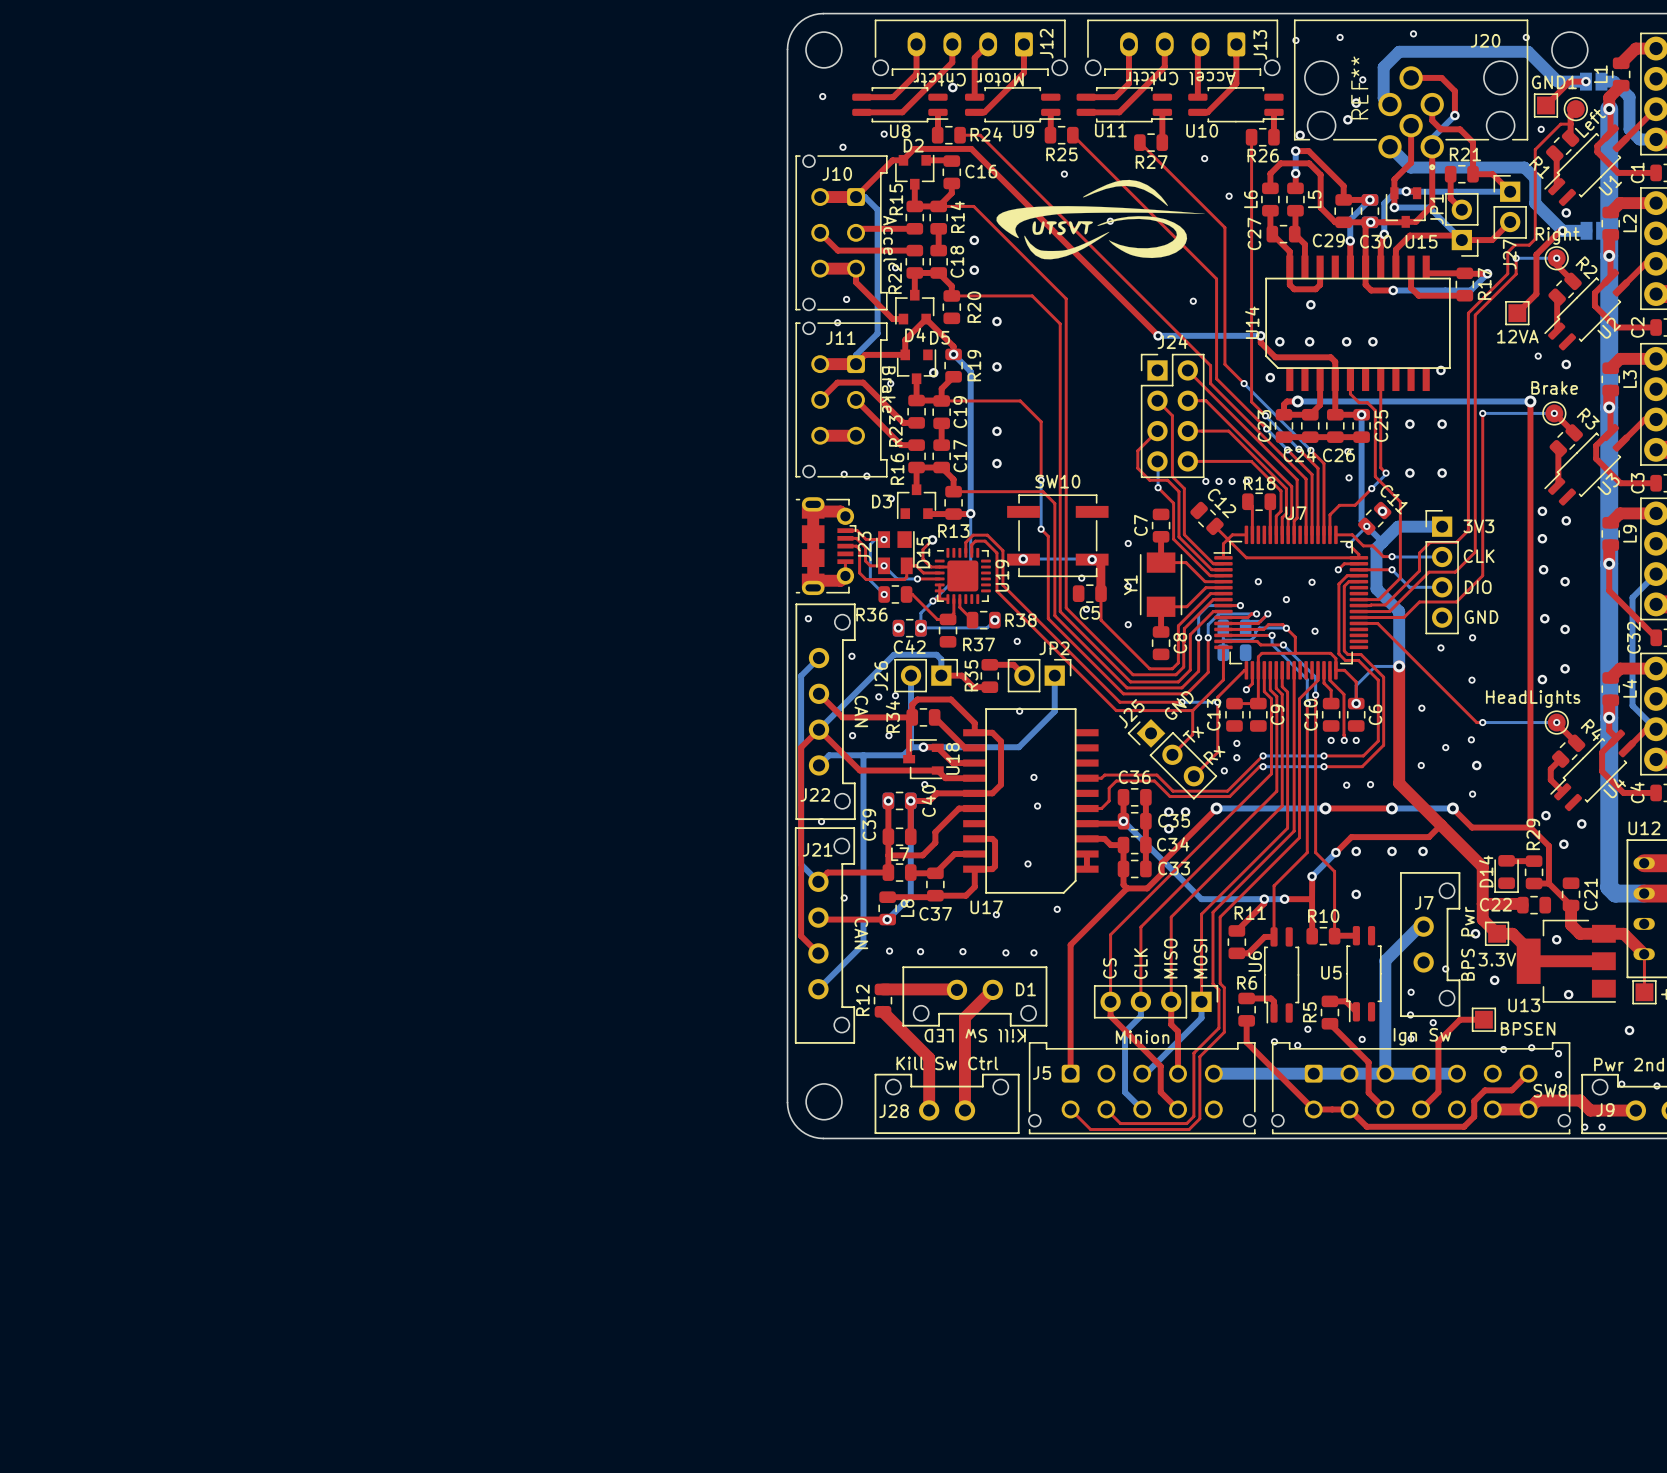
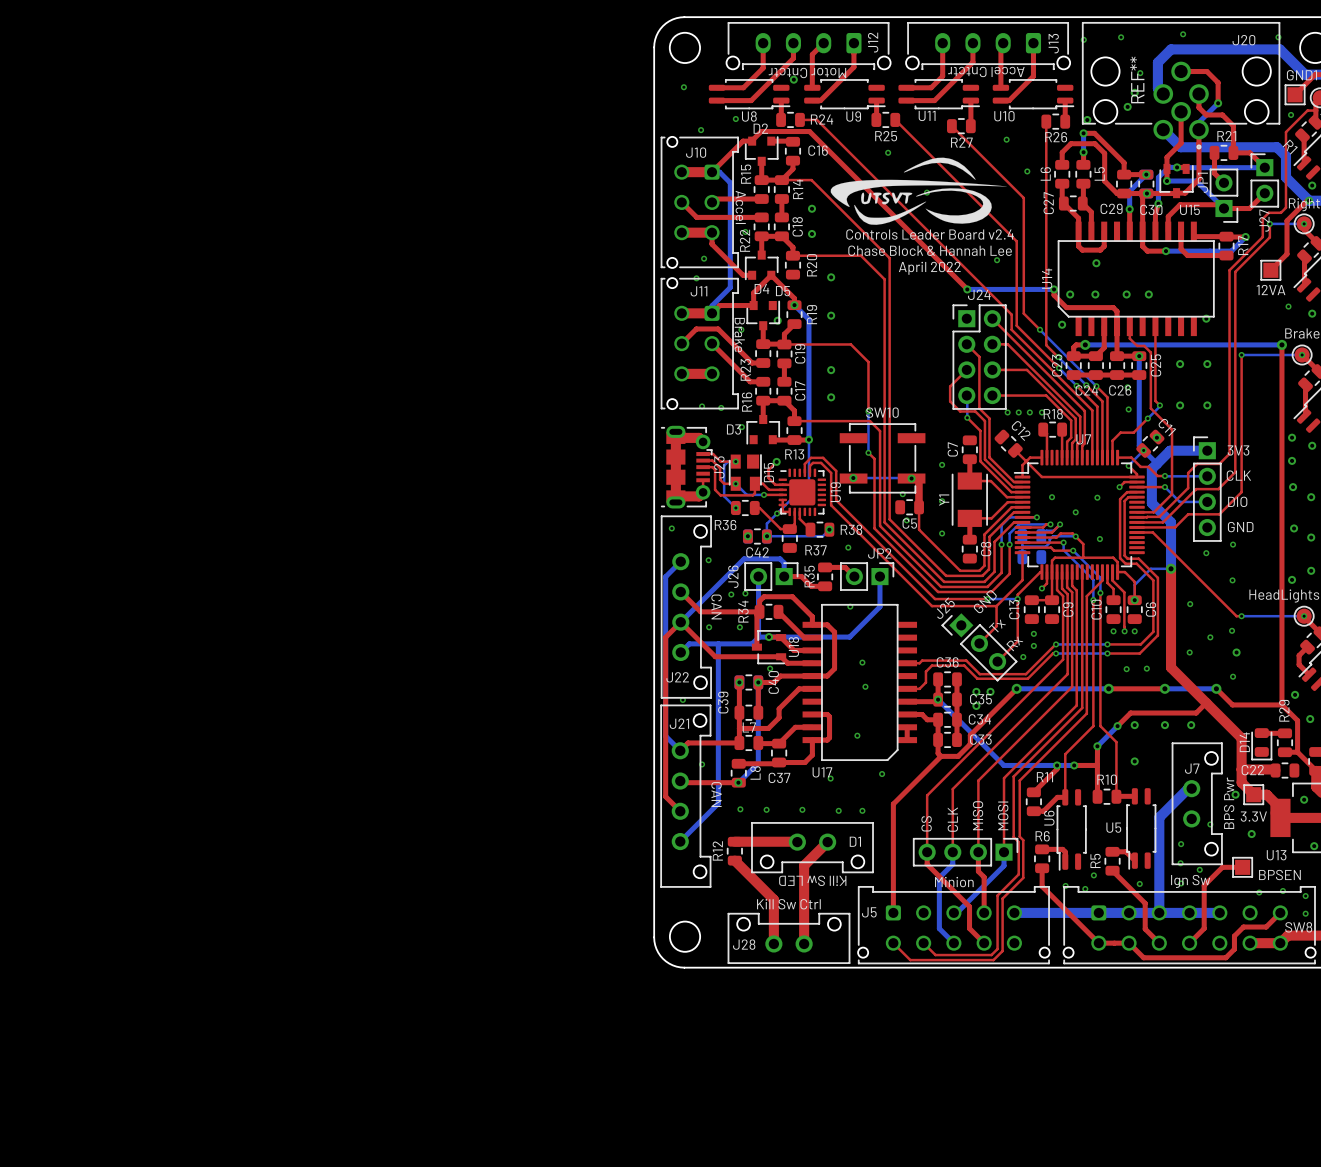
text: none -> Controls Leader Board v2.4 (930, 234)
text: none -> Chase Block & Hannah Lee (930, 250)
text: none -> April 2022 (929, 268)

